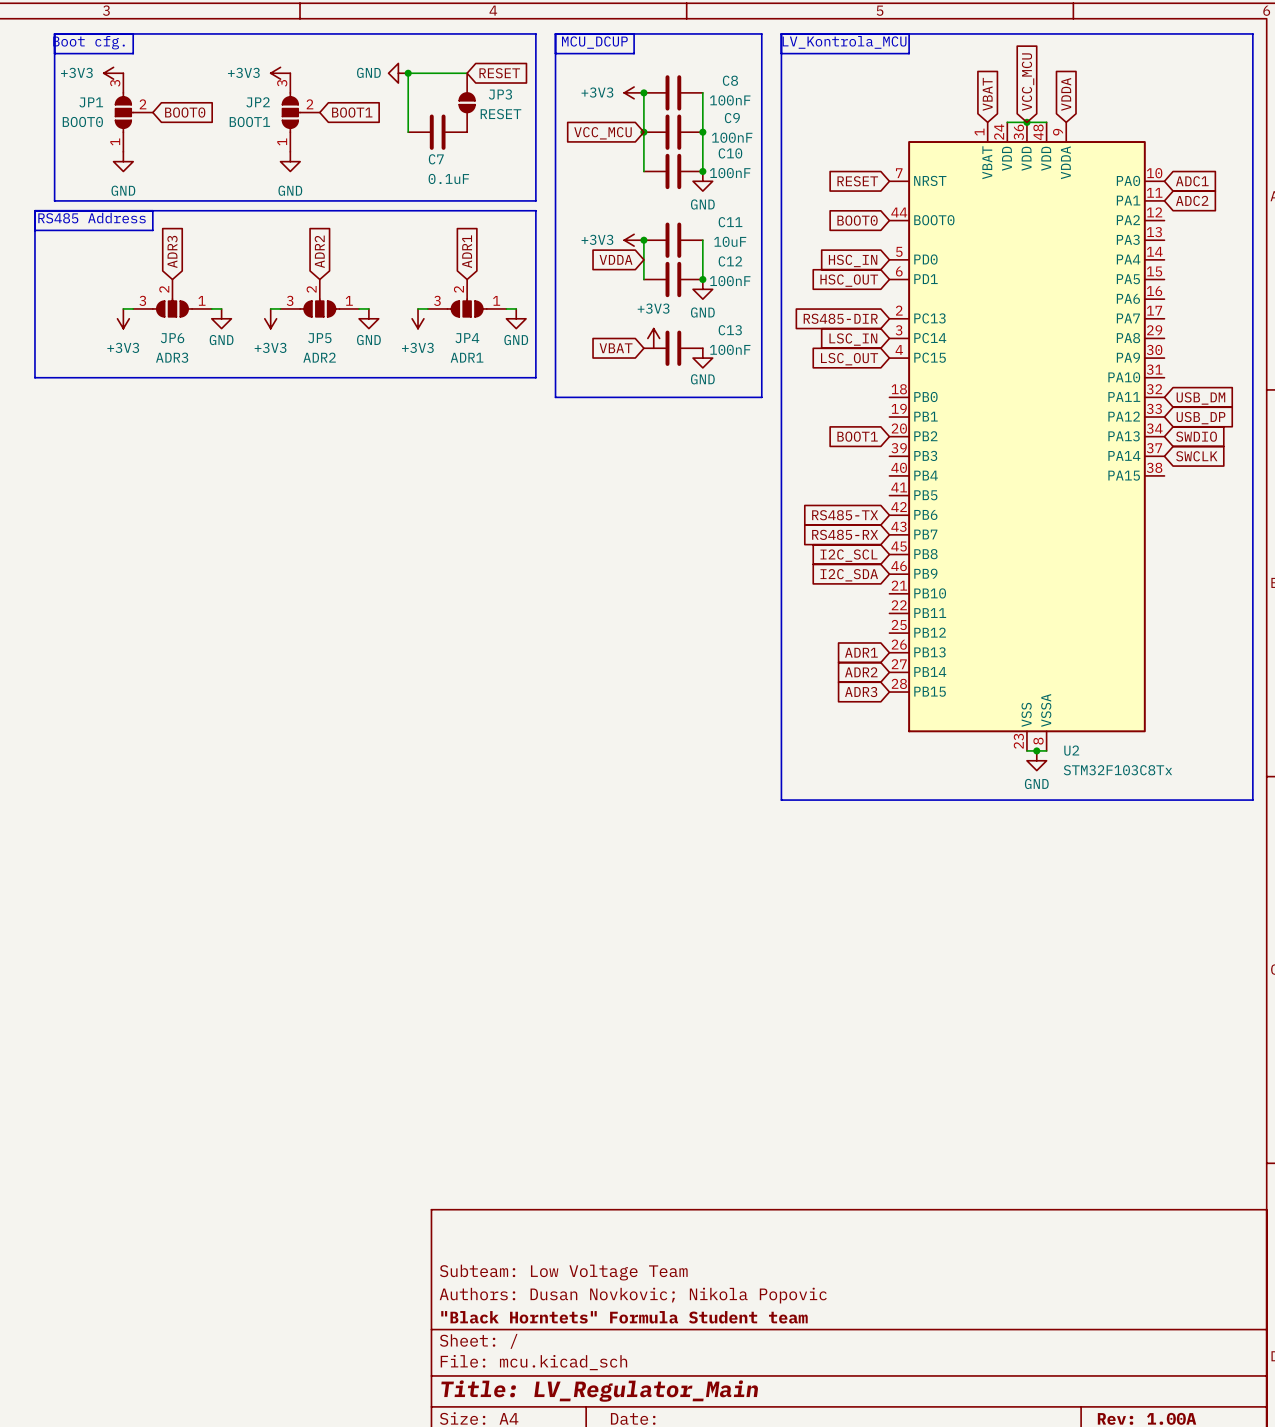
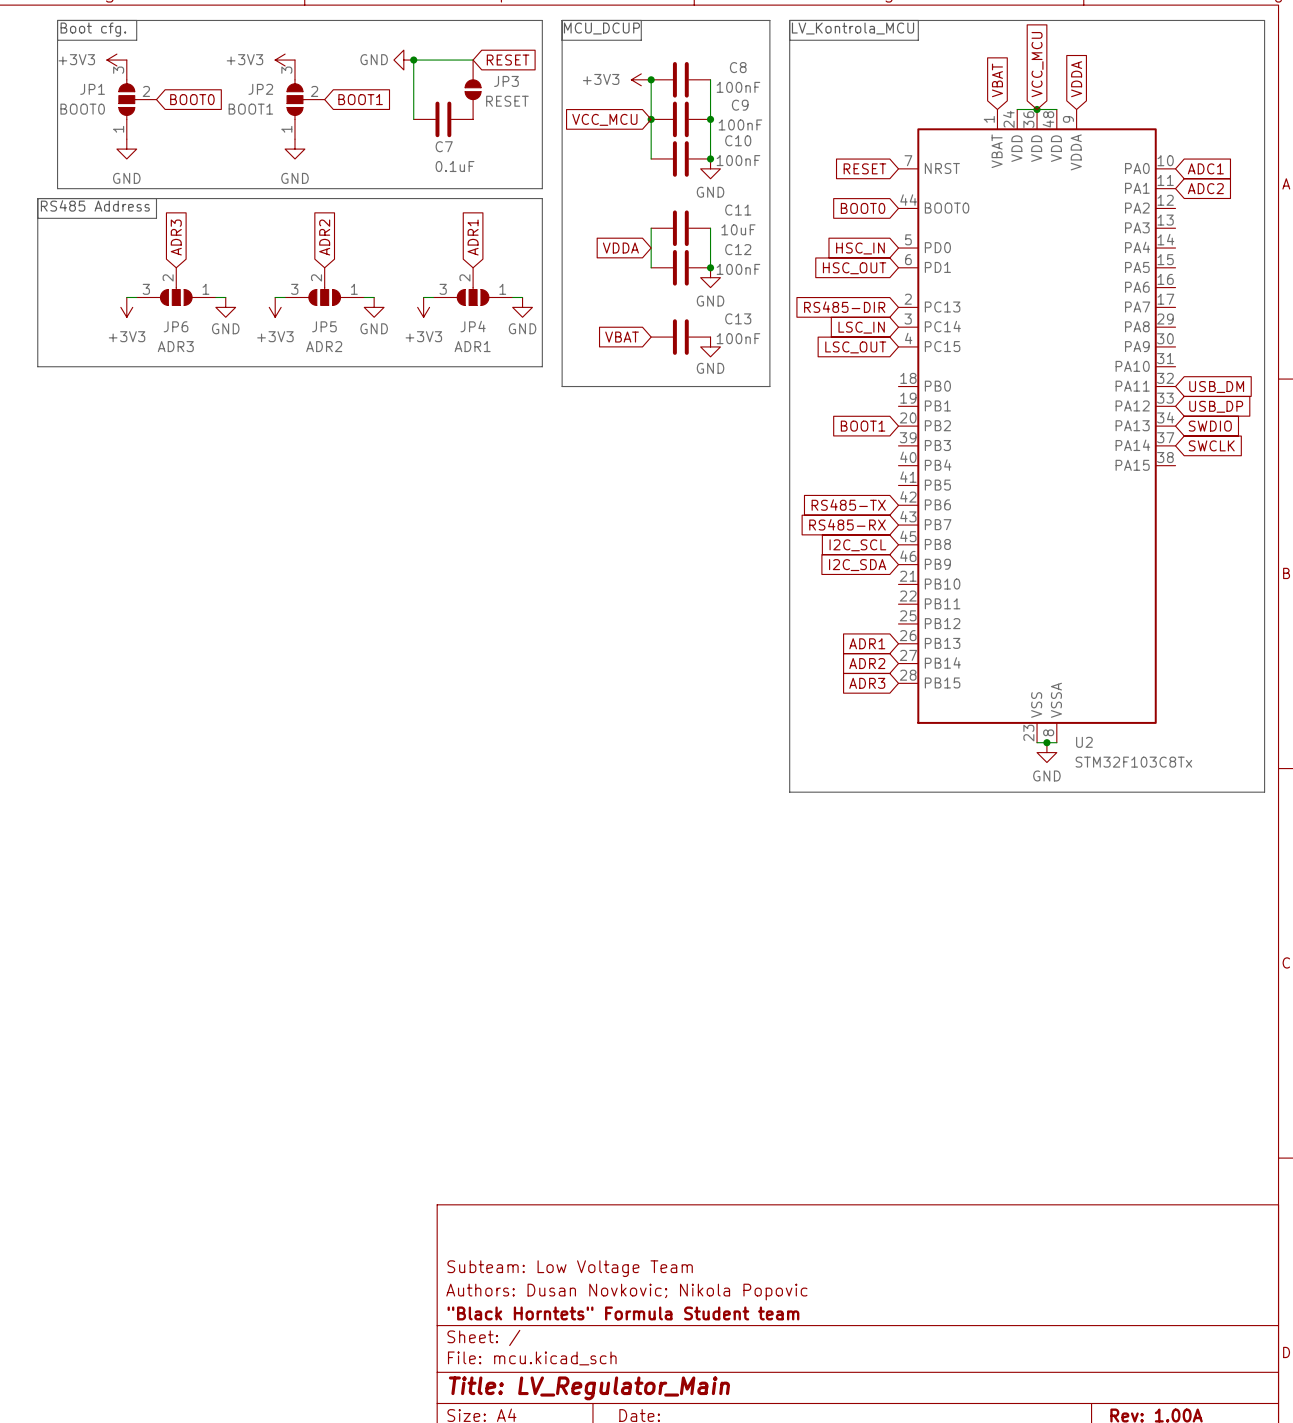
power symbol: +3V3 (634, 240) -> none
junction: (643, 240) -> none
power symbol: +3V3 (653, 338) -> none

